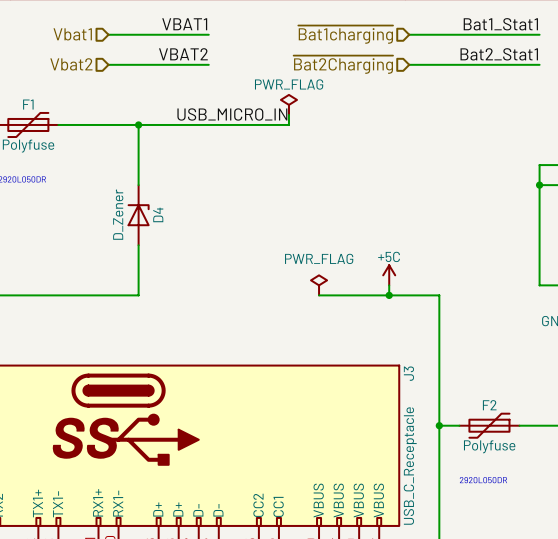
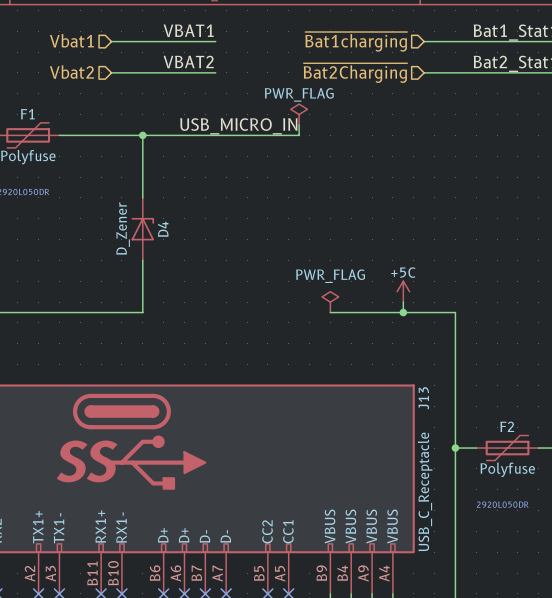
J3 name: J3 (408, 373) -> J13 (423, 398)

